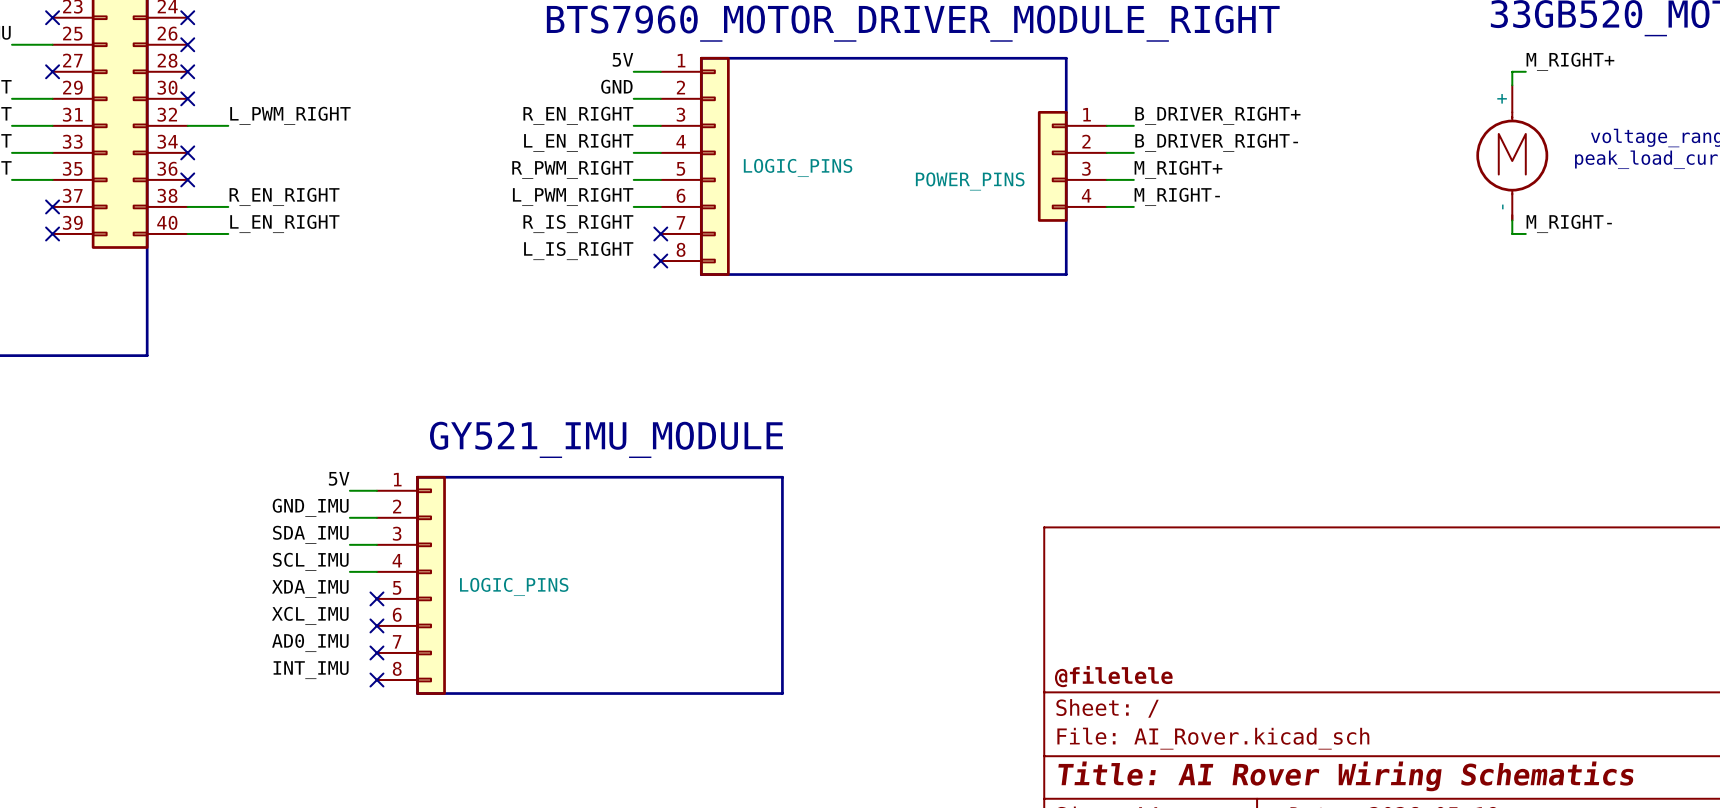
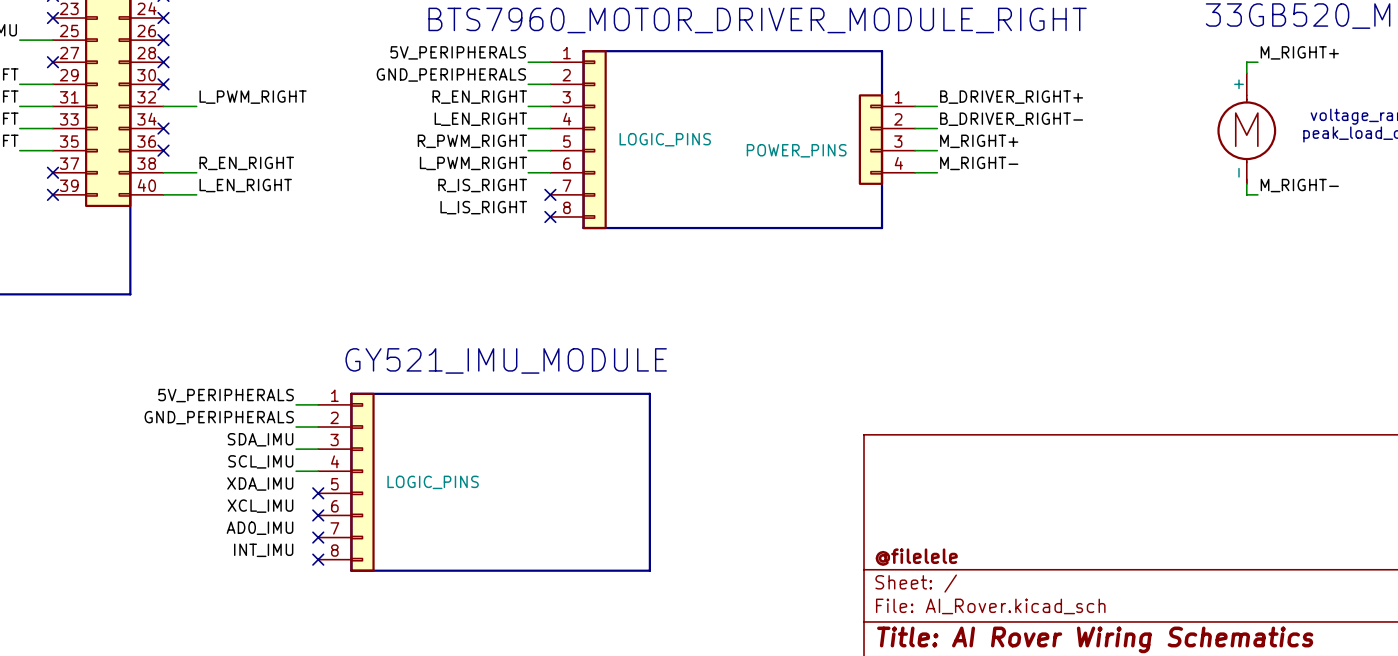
label: 5V (622, 59) -> 5V_PERIPHERALS (458, 52)
label: GND (616, 86) -> GND_PERIPHERALS (451, 74)
label: 5V (339, 478) -> 5V_PERIPHERALS (226, 395)
label: GND_IMU (310, 507) -> GND_PERIPHERALS (219, 417)

